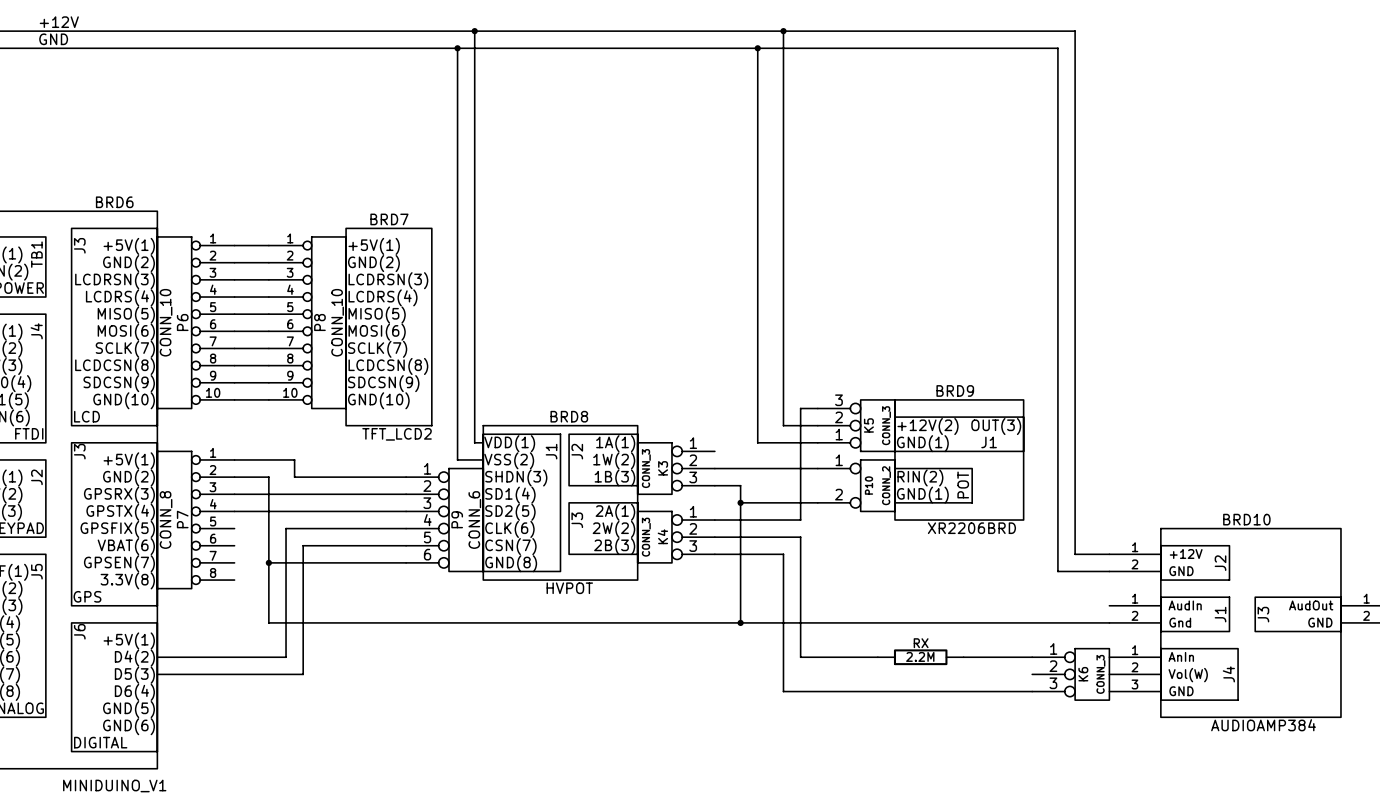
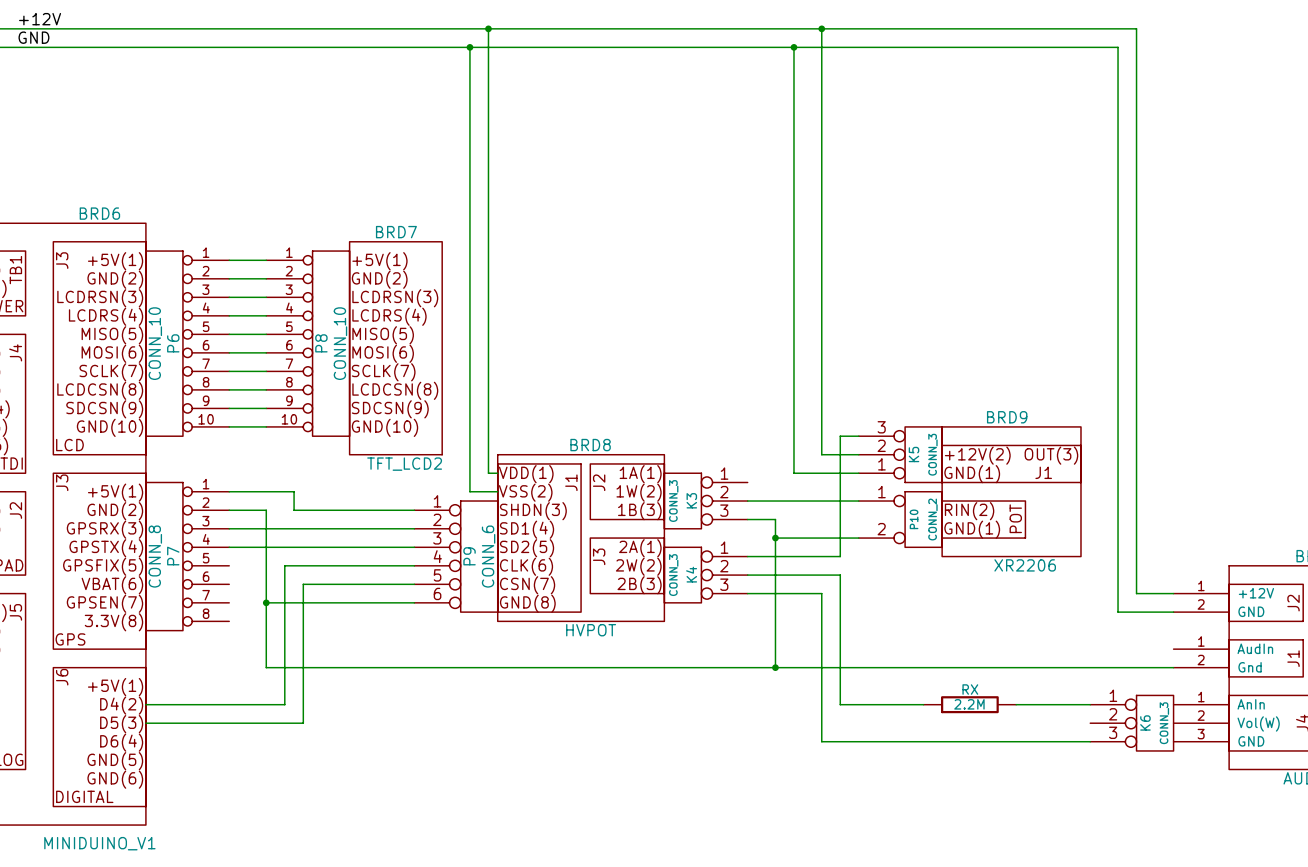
BRD9 value: XR2206BRD (971, 528) -> XR2206 (1025, 565)

